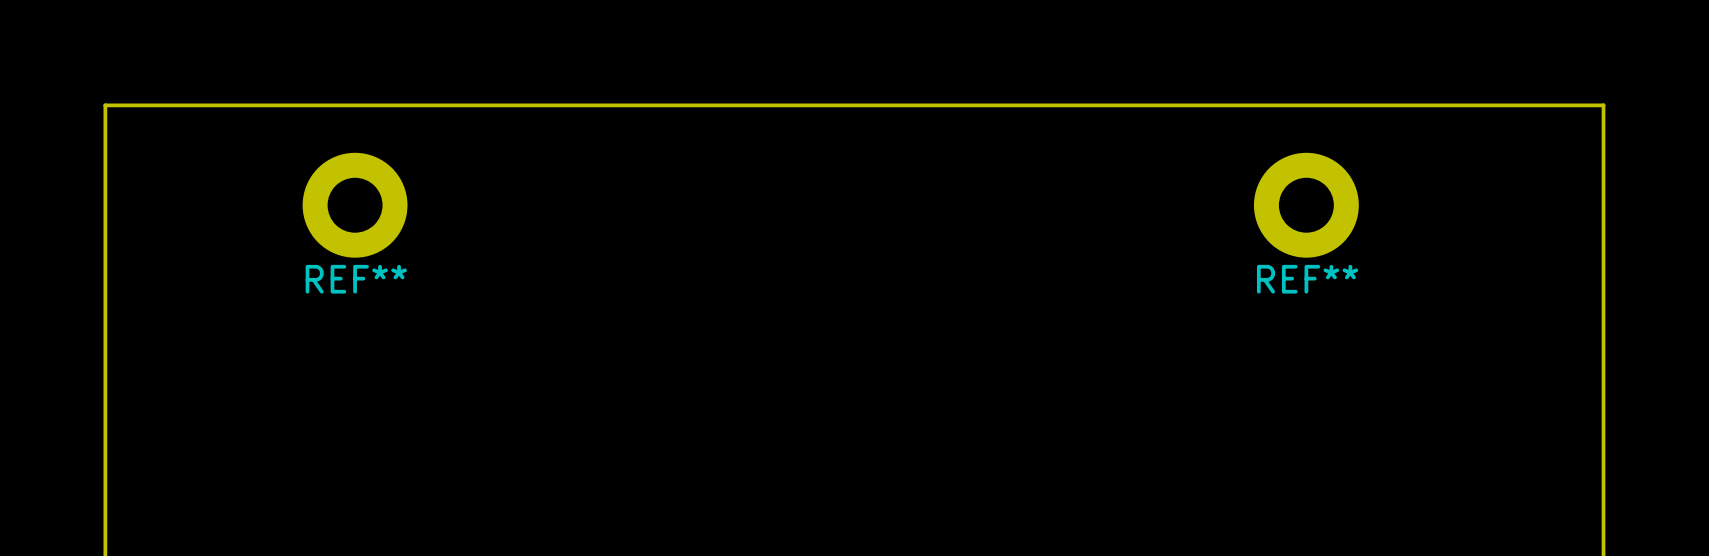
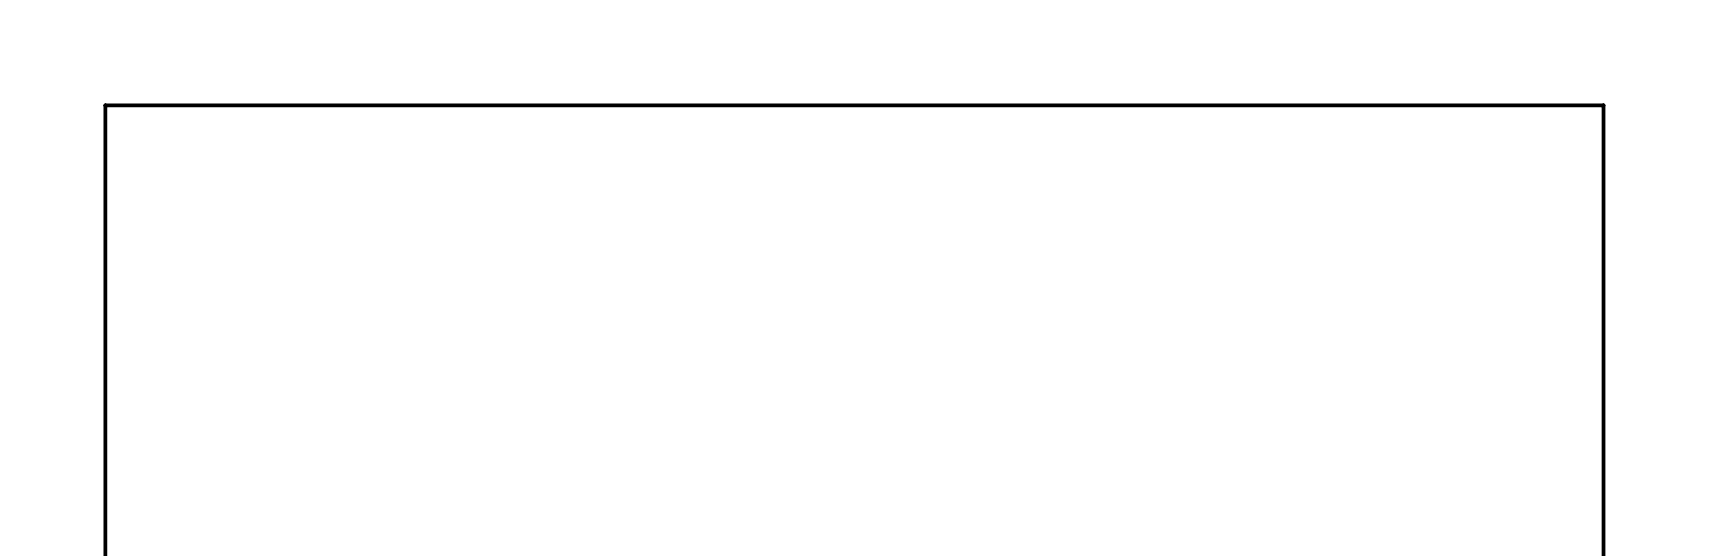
REF**: (355, 205) -> none
REF**: (1306, 205) -> none

